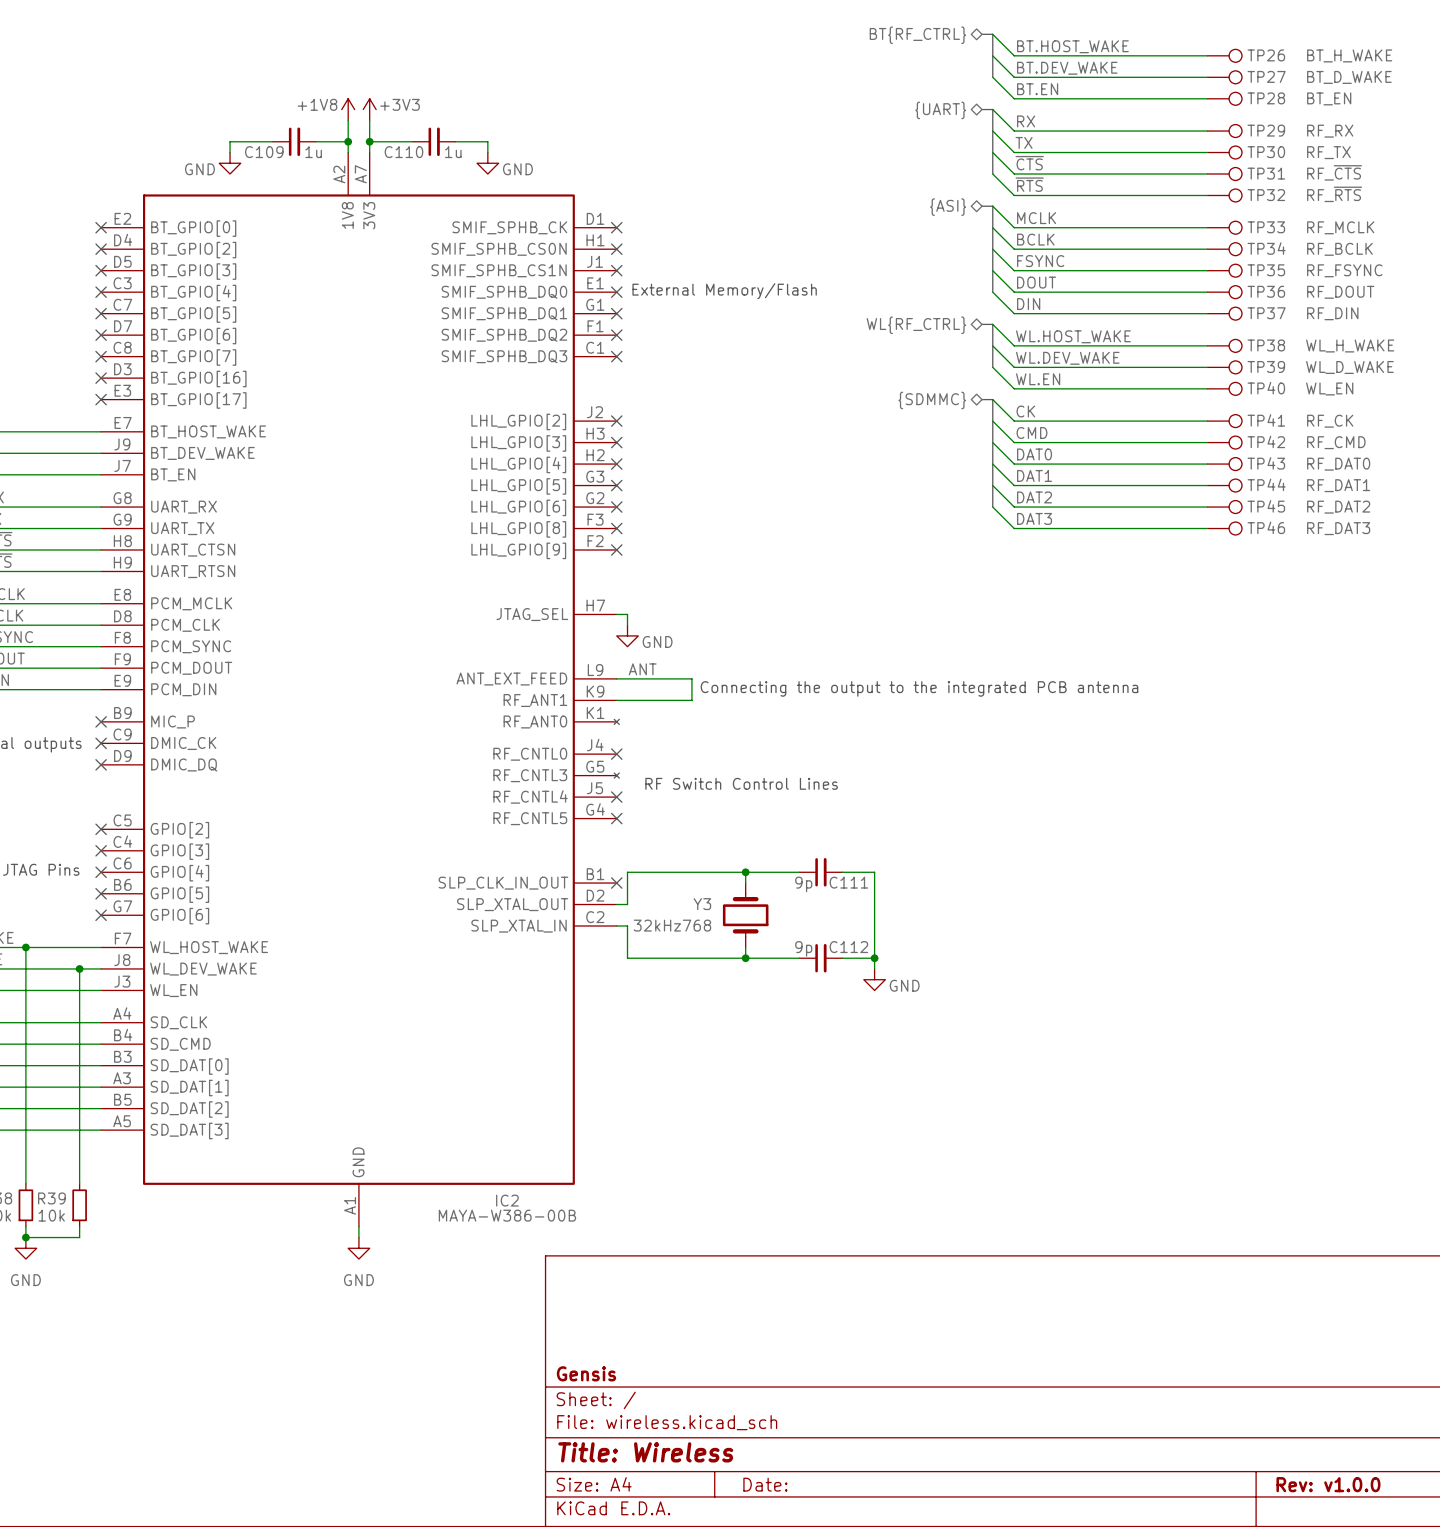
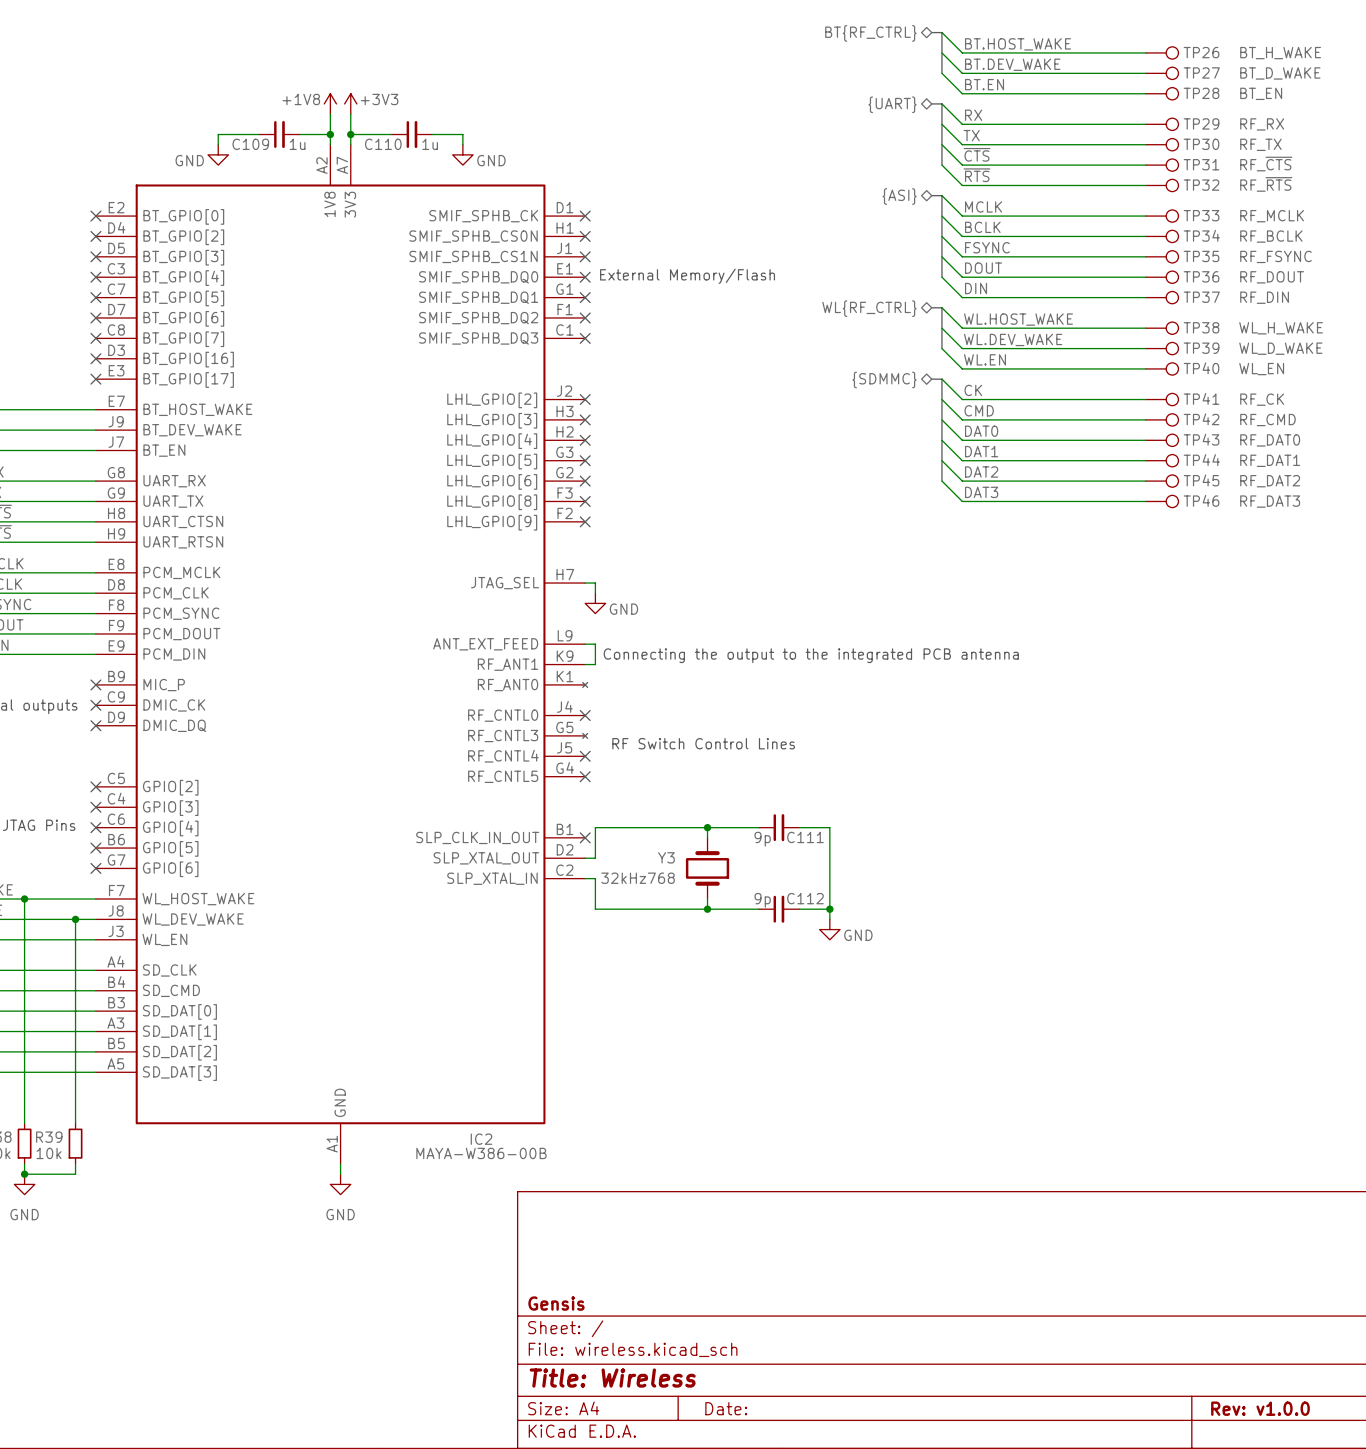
label: ANT (642, 669) -> none
wire: (627, 678) (691, 678) (691, 700) (627, 700) -> (595, 644) (595, 664)
text position: Connecting the output to the integrated PCB antenna (919, 688) -> Connecting the output to the integrated PCB antenna (811, 655)

